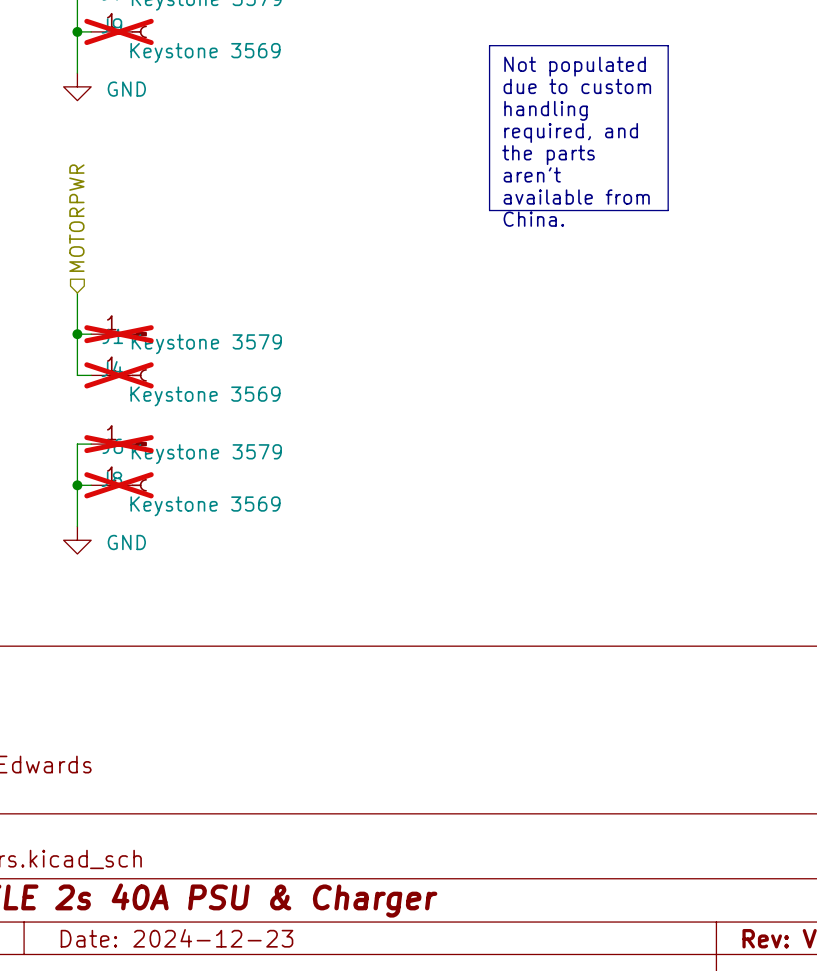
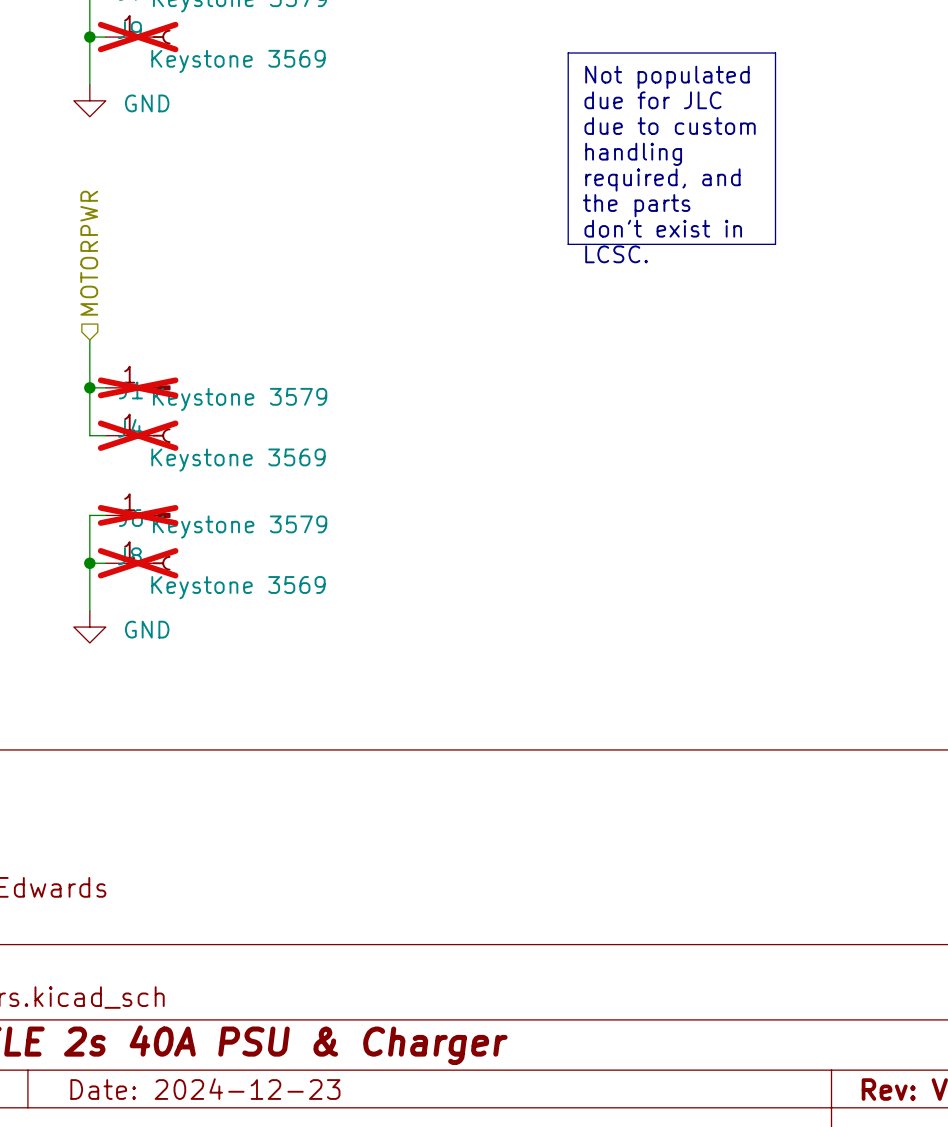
text: due to custom (577, 86) -> due for JLC (653, 100)
text: handling (545, 110) -> due to custom (670, 125)
text: required, and (571, 132) -> handling (633, 154)
text: the parts (548, 155) -> required, and (662, 179)
text: aren't (532, 174) -> the parts (636, 205)
text: available from (576, 197) -> don't exist in (663, 228)
text: China. (533, 219) -> LCSC. (616, 254)

